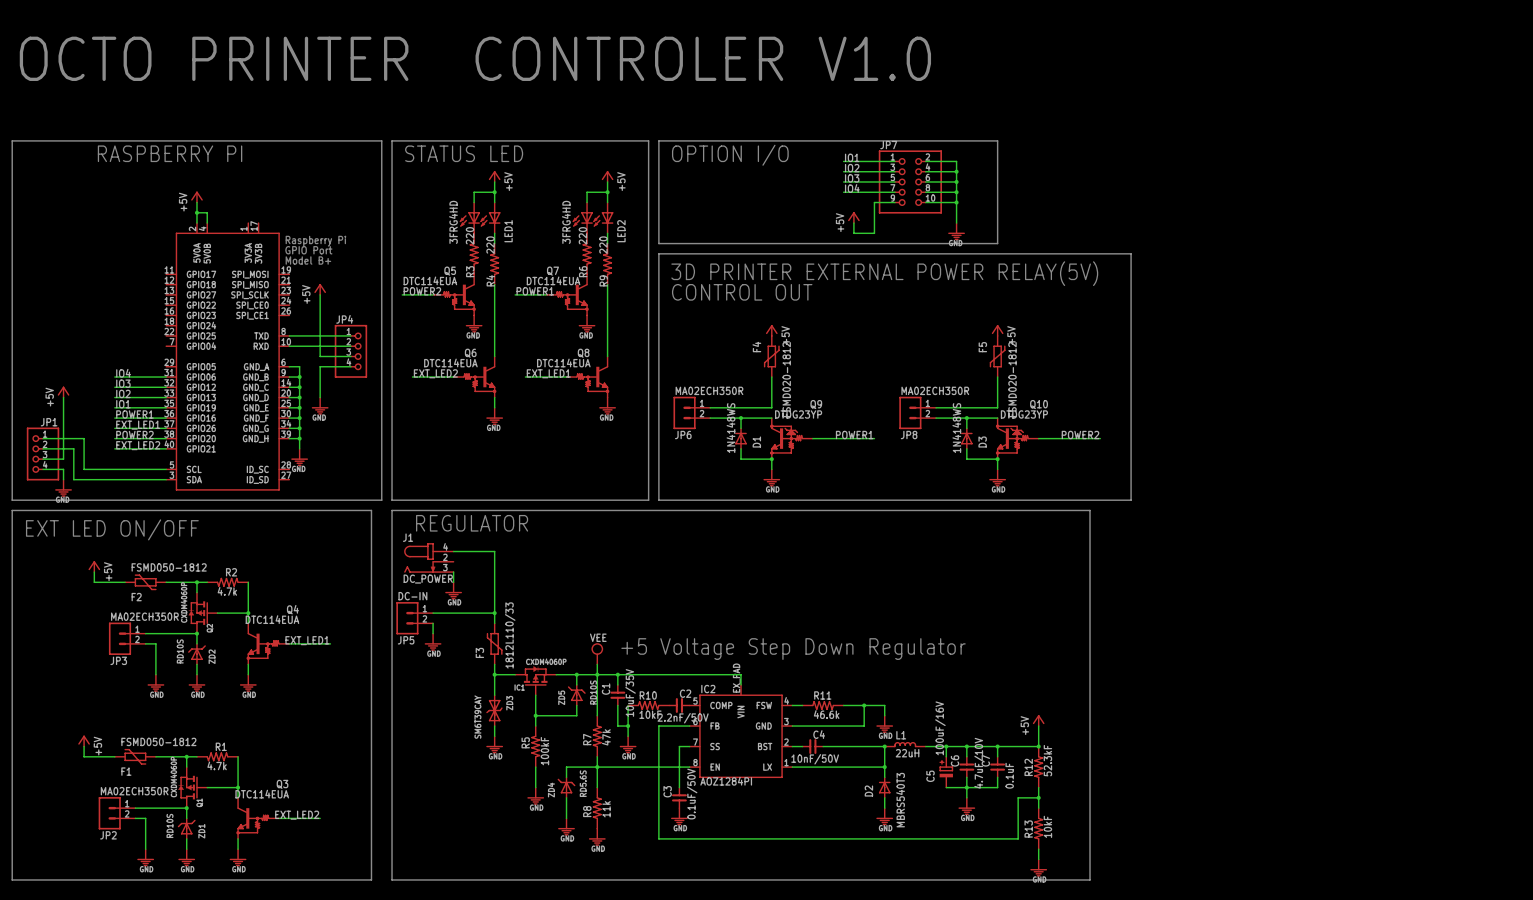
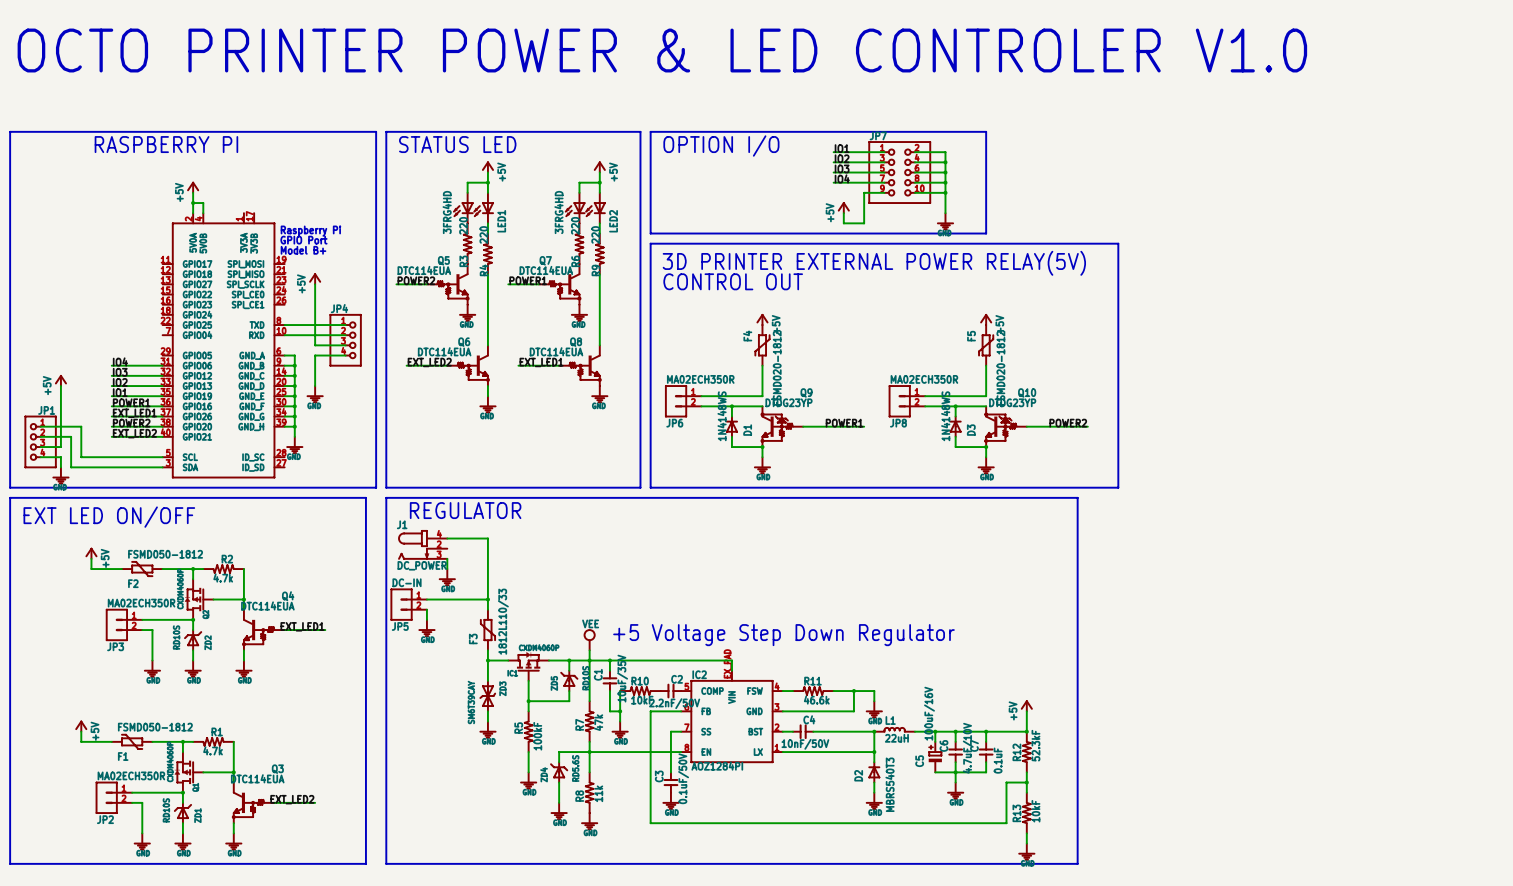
text: OCTO PRINTER CONTROLER V1.0 (475, 58) -> OCTO PRINTER POWER & LED CONTROLER V1.0 (662, 50)

